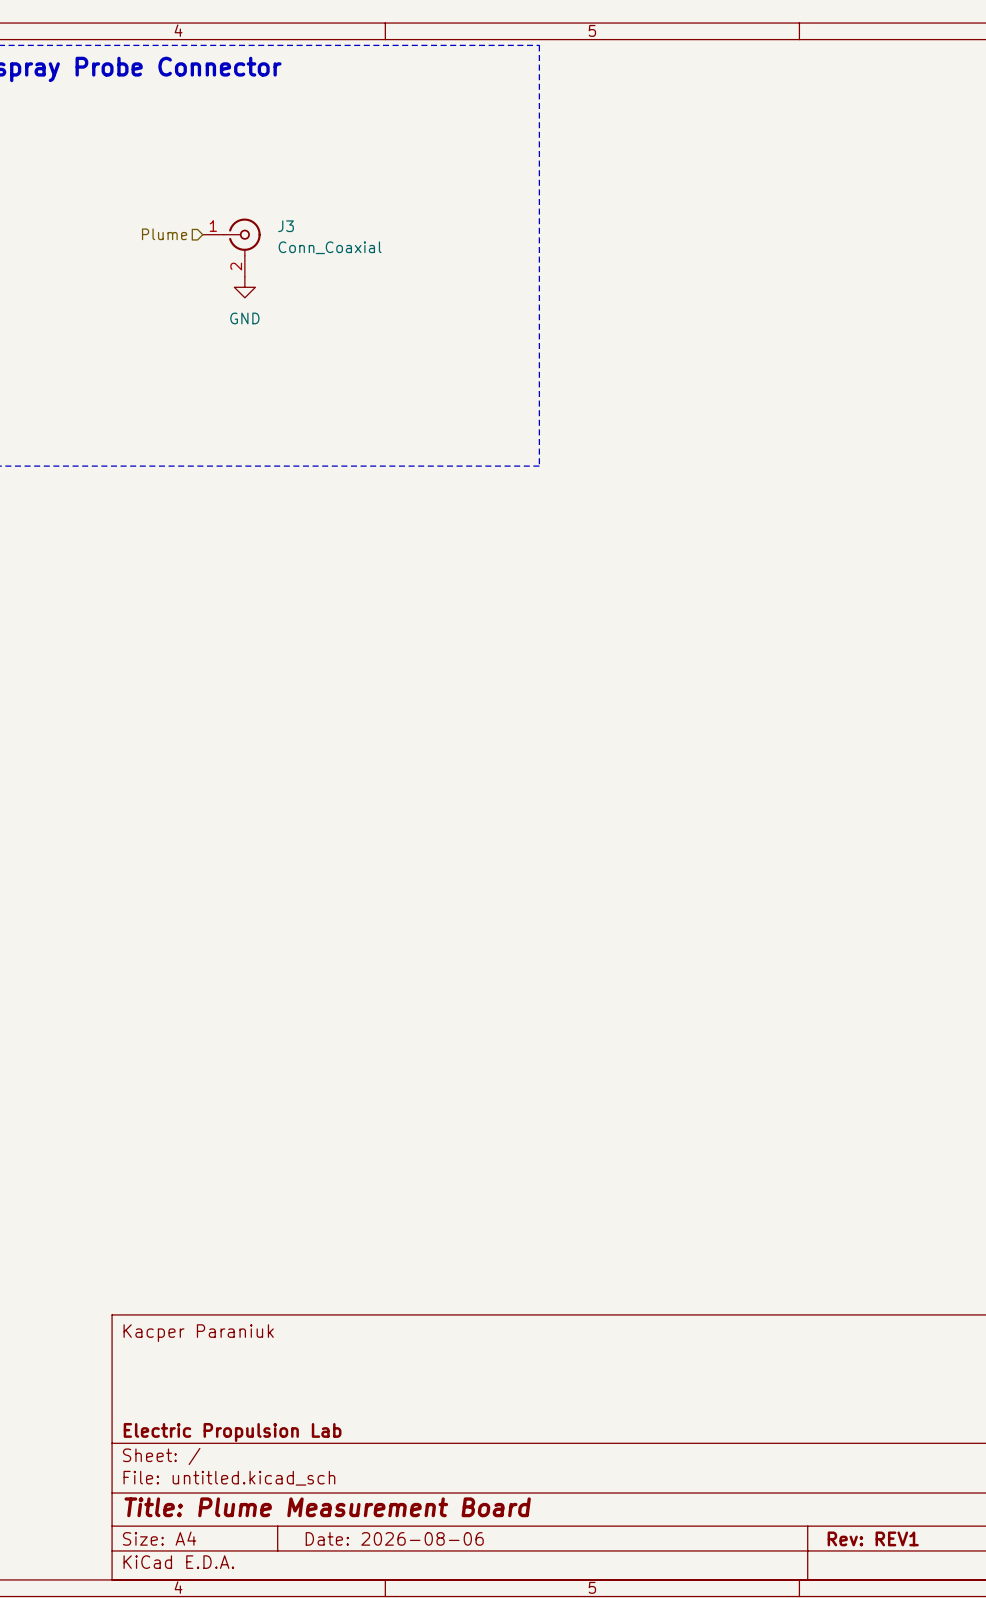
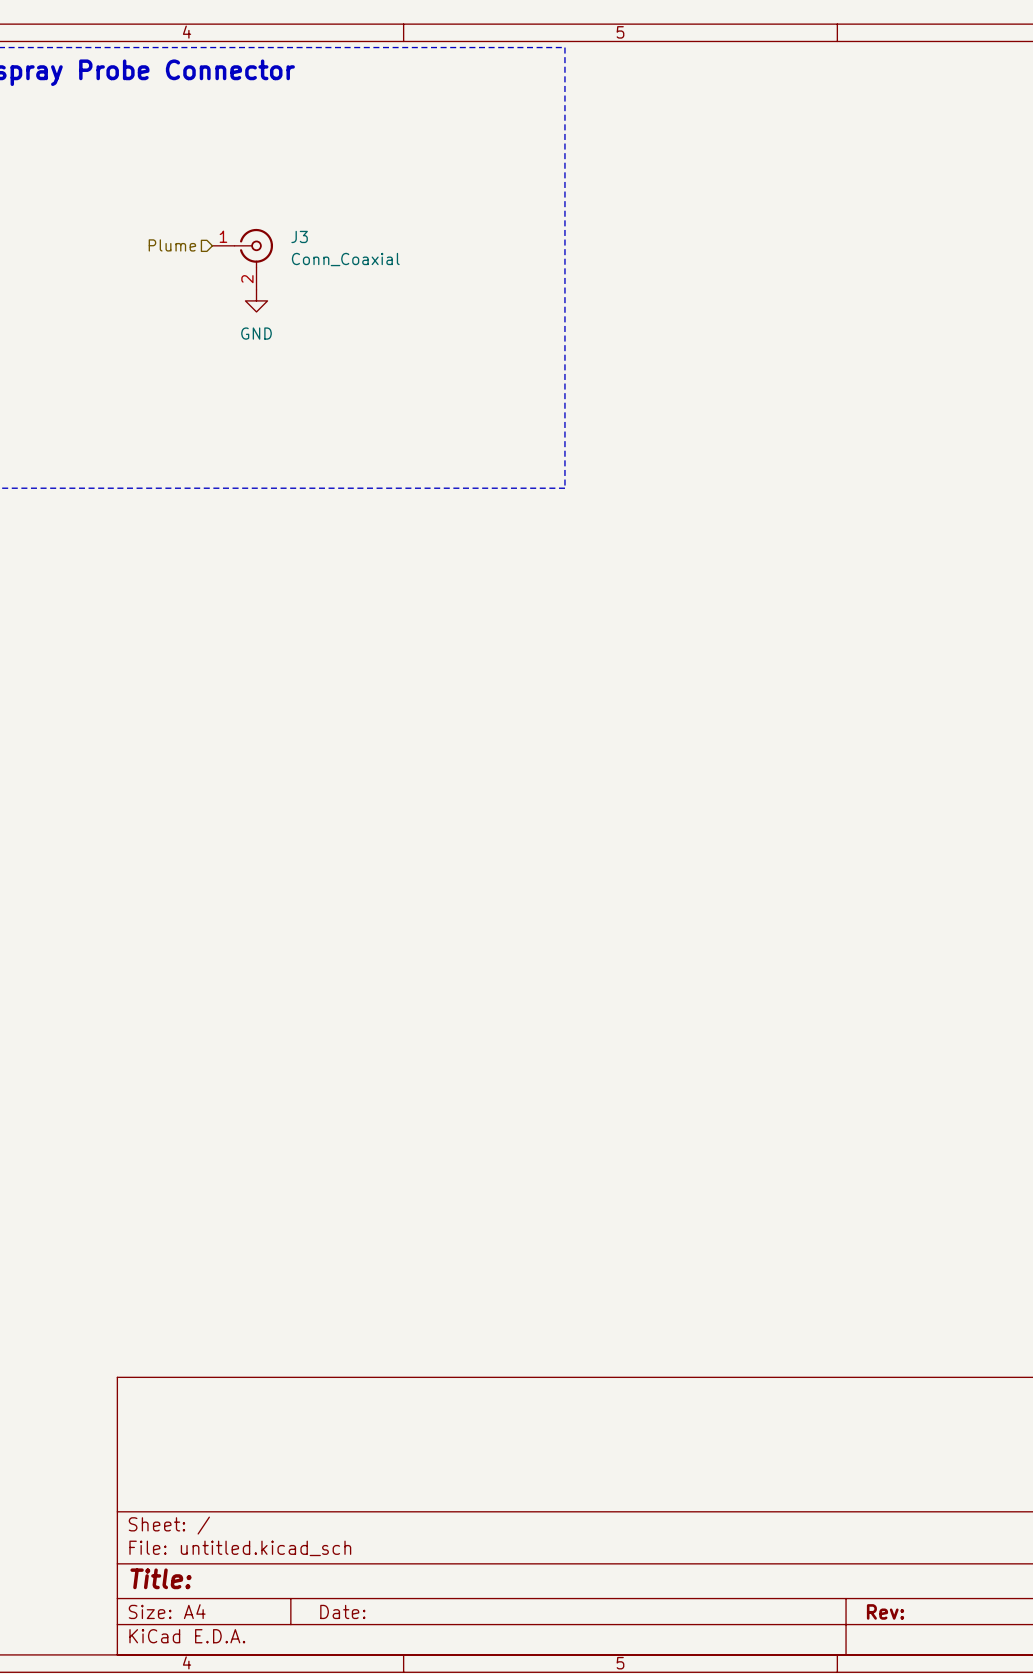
title block: Kacper Paraniuk (198, 1333) -> none
title block: Electric Propulsion Lab (232, 1432) -> none
title block: Title: Plume Measurement Board (327, 1507) -> Title: (161, 1578)
title block: Date: 2026-08-06 (394, 1538) -> Date: (342, 1611)
title block: Rev: REV1 (873, 1538) -> Rev: (885, 1611)

